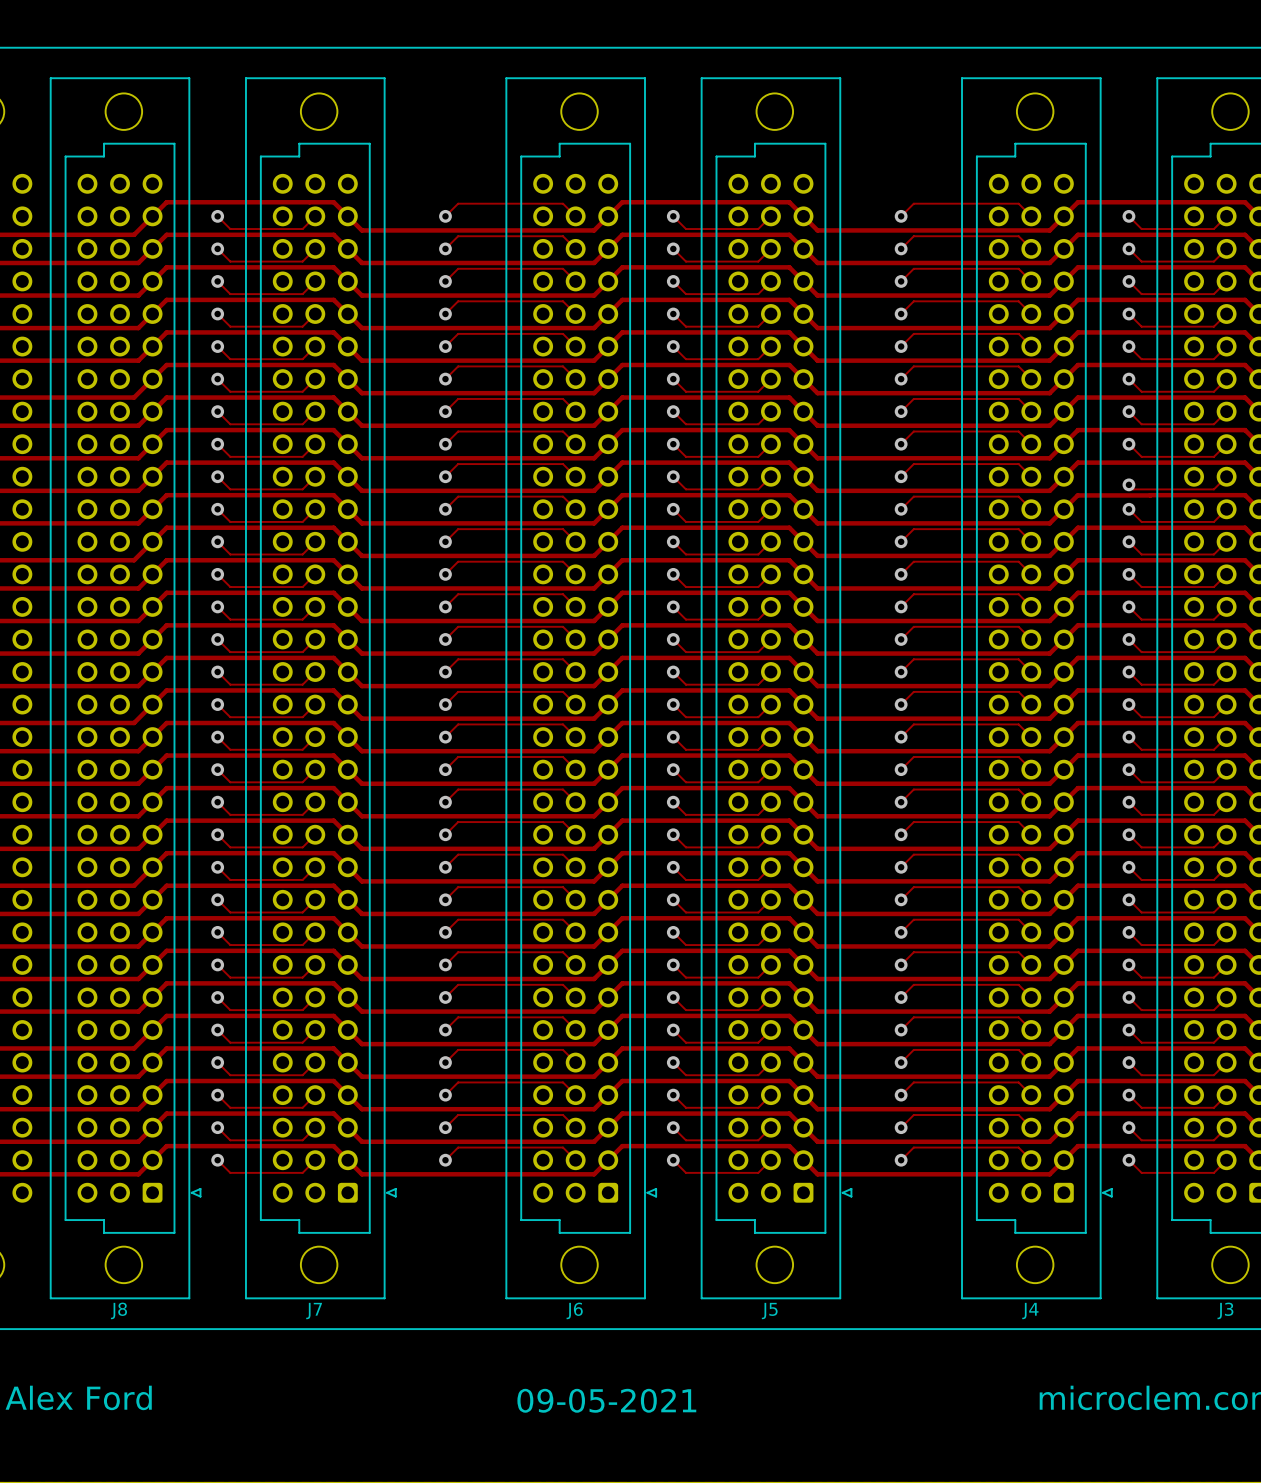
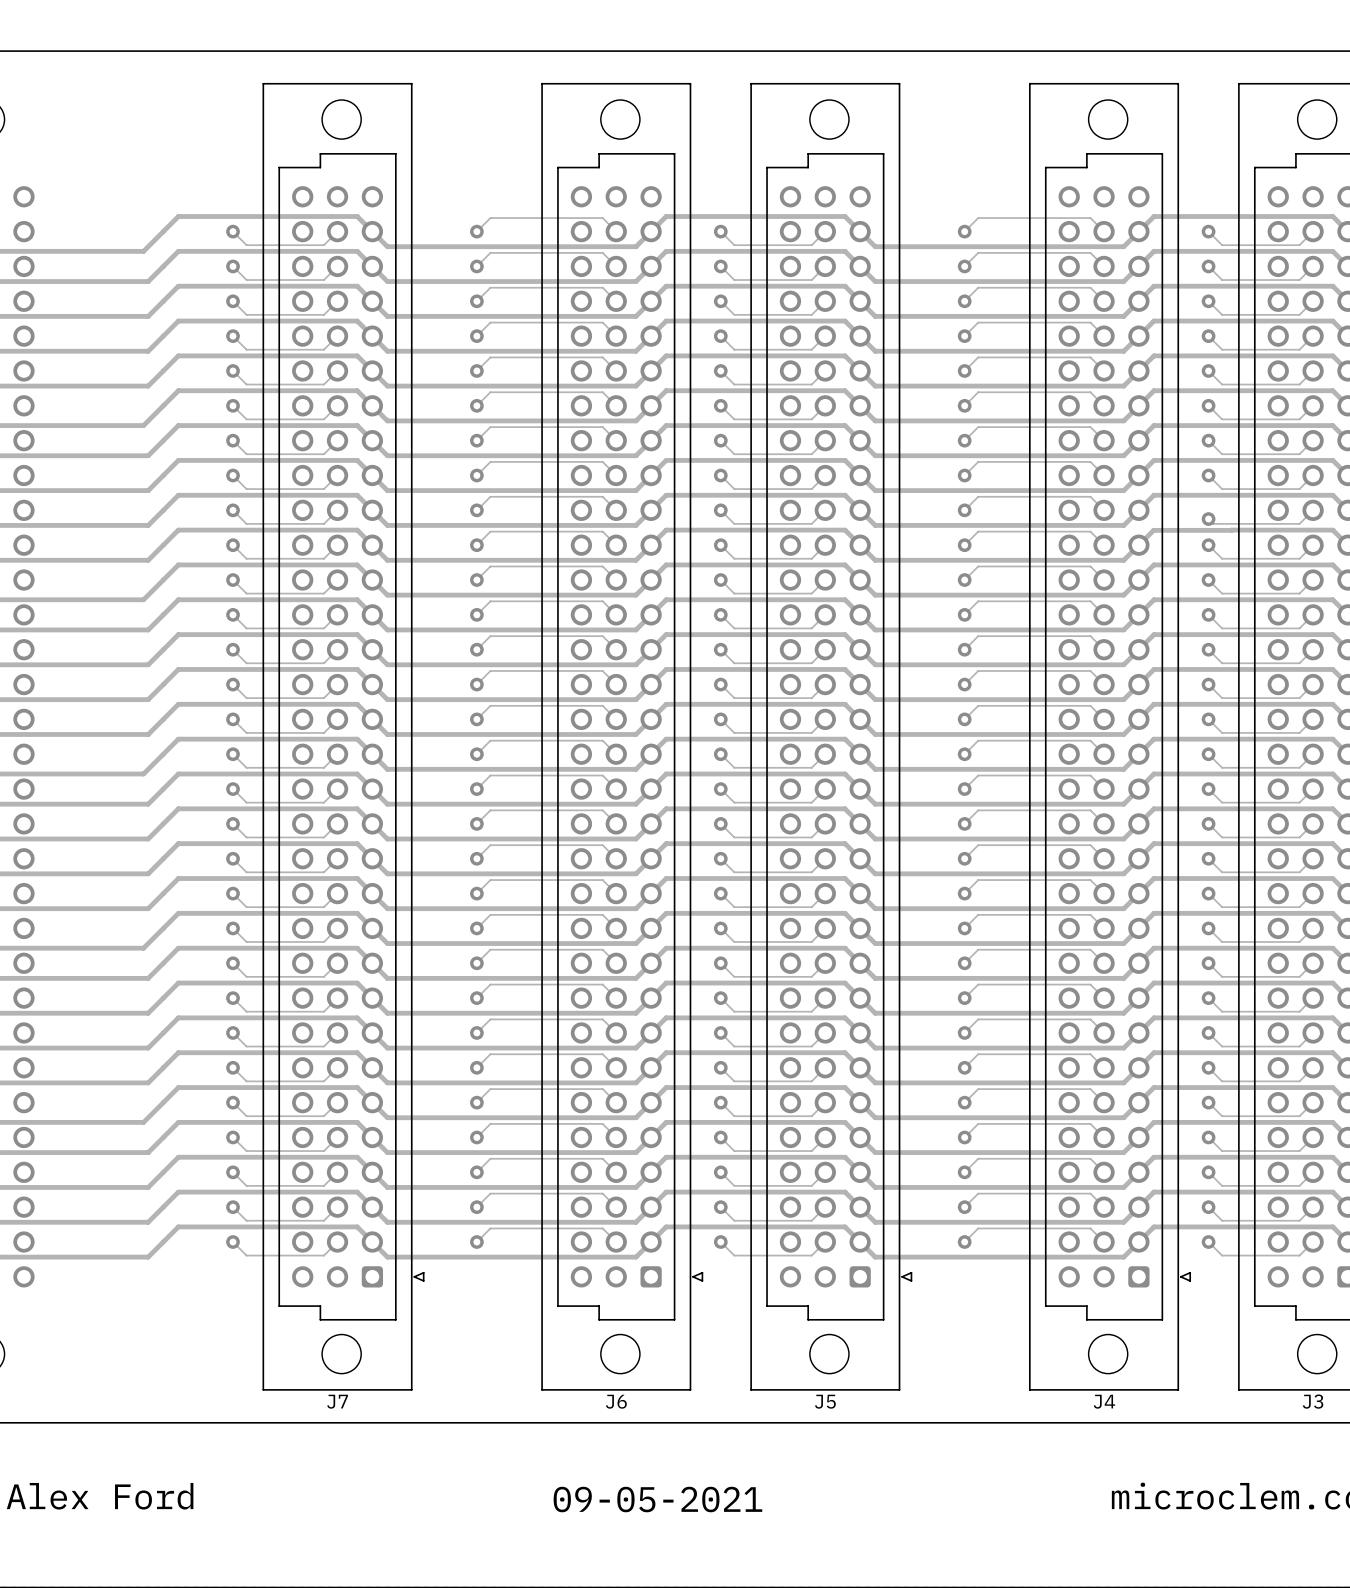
J8: (125, 688) -> none

